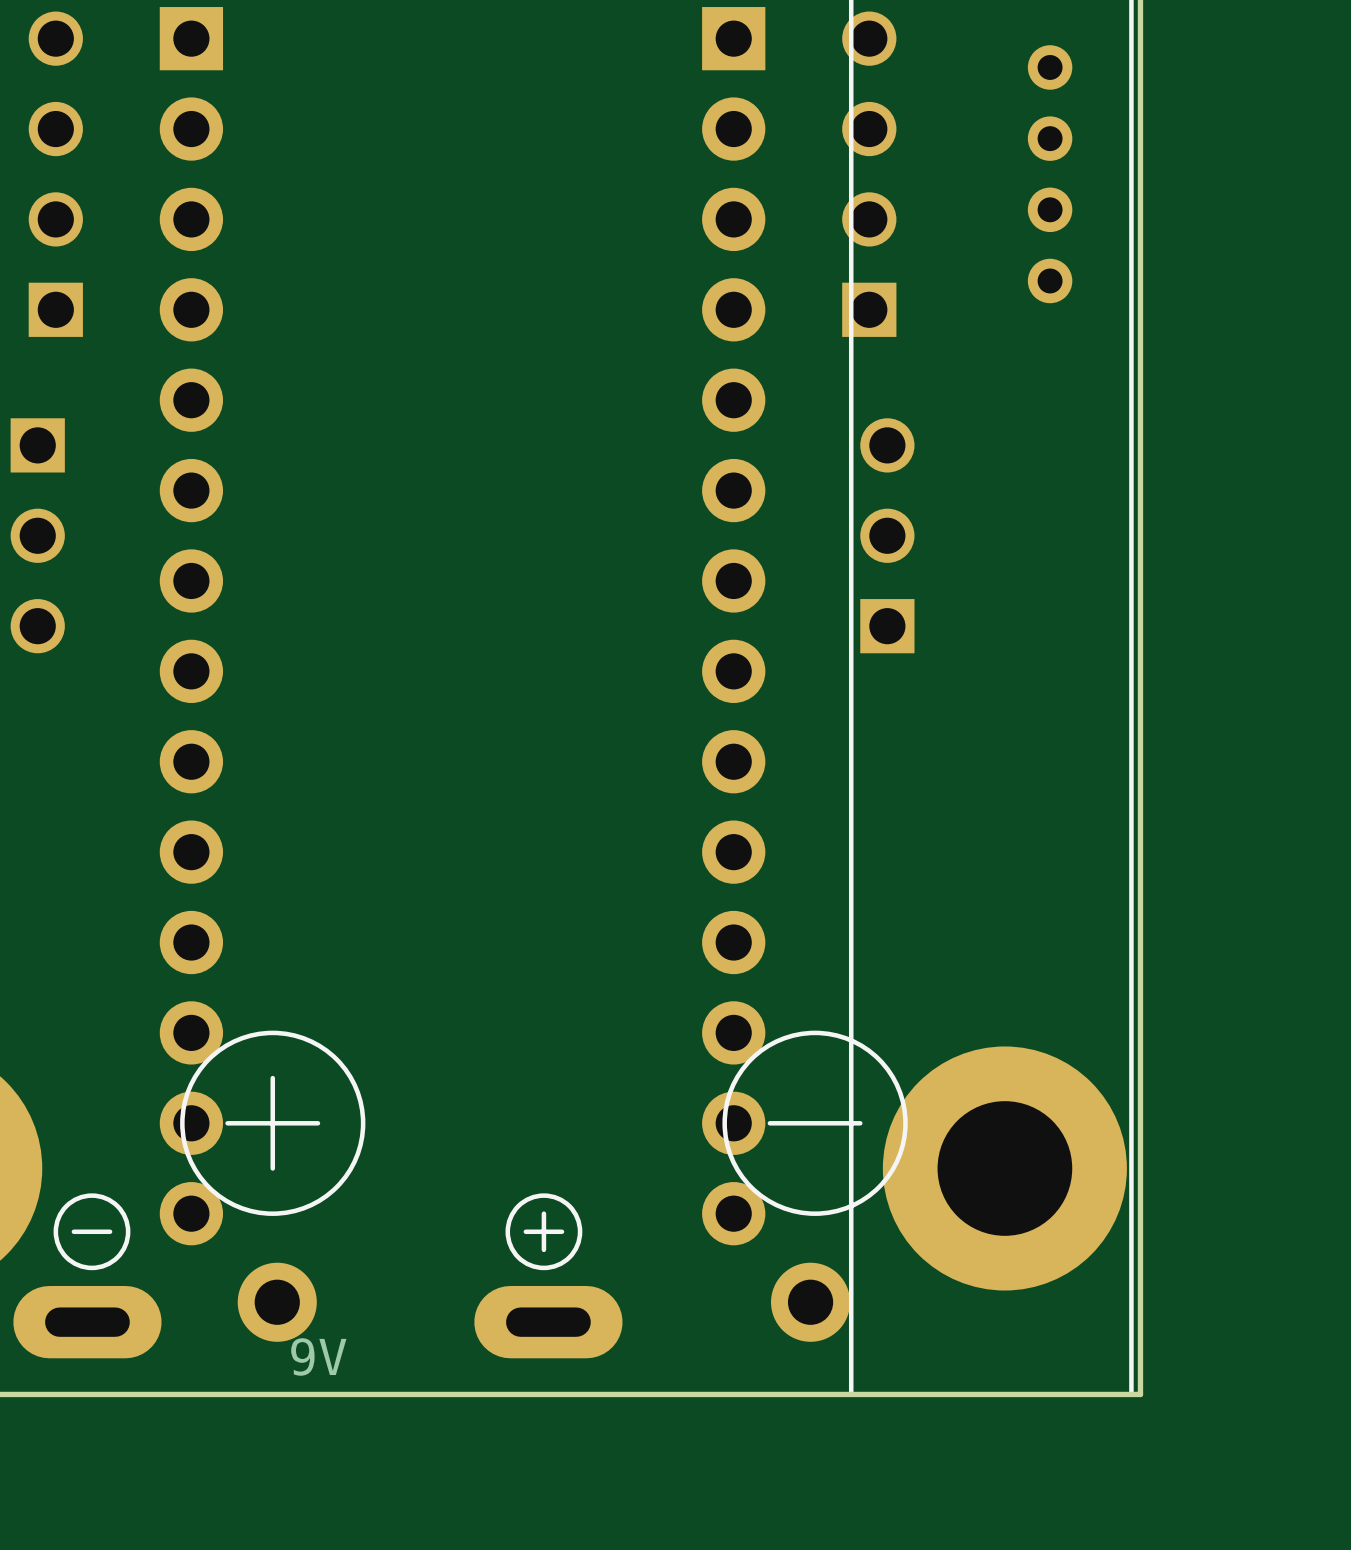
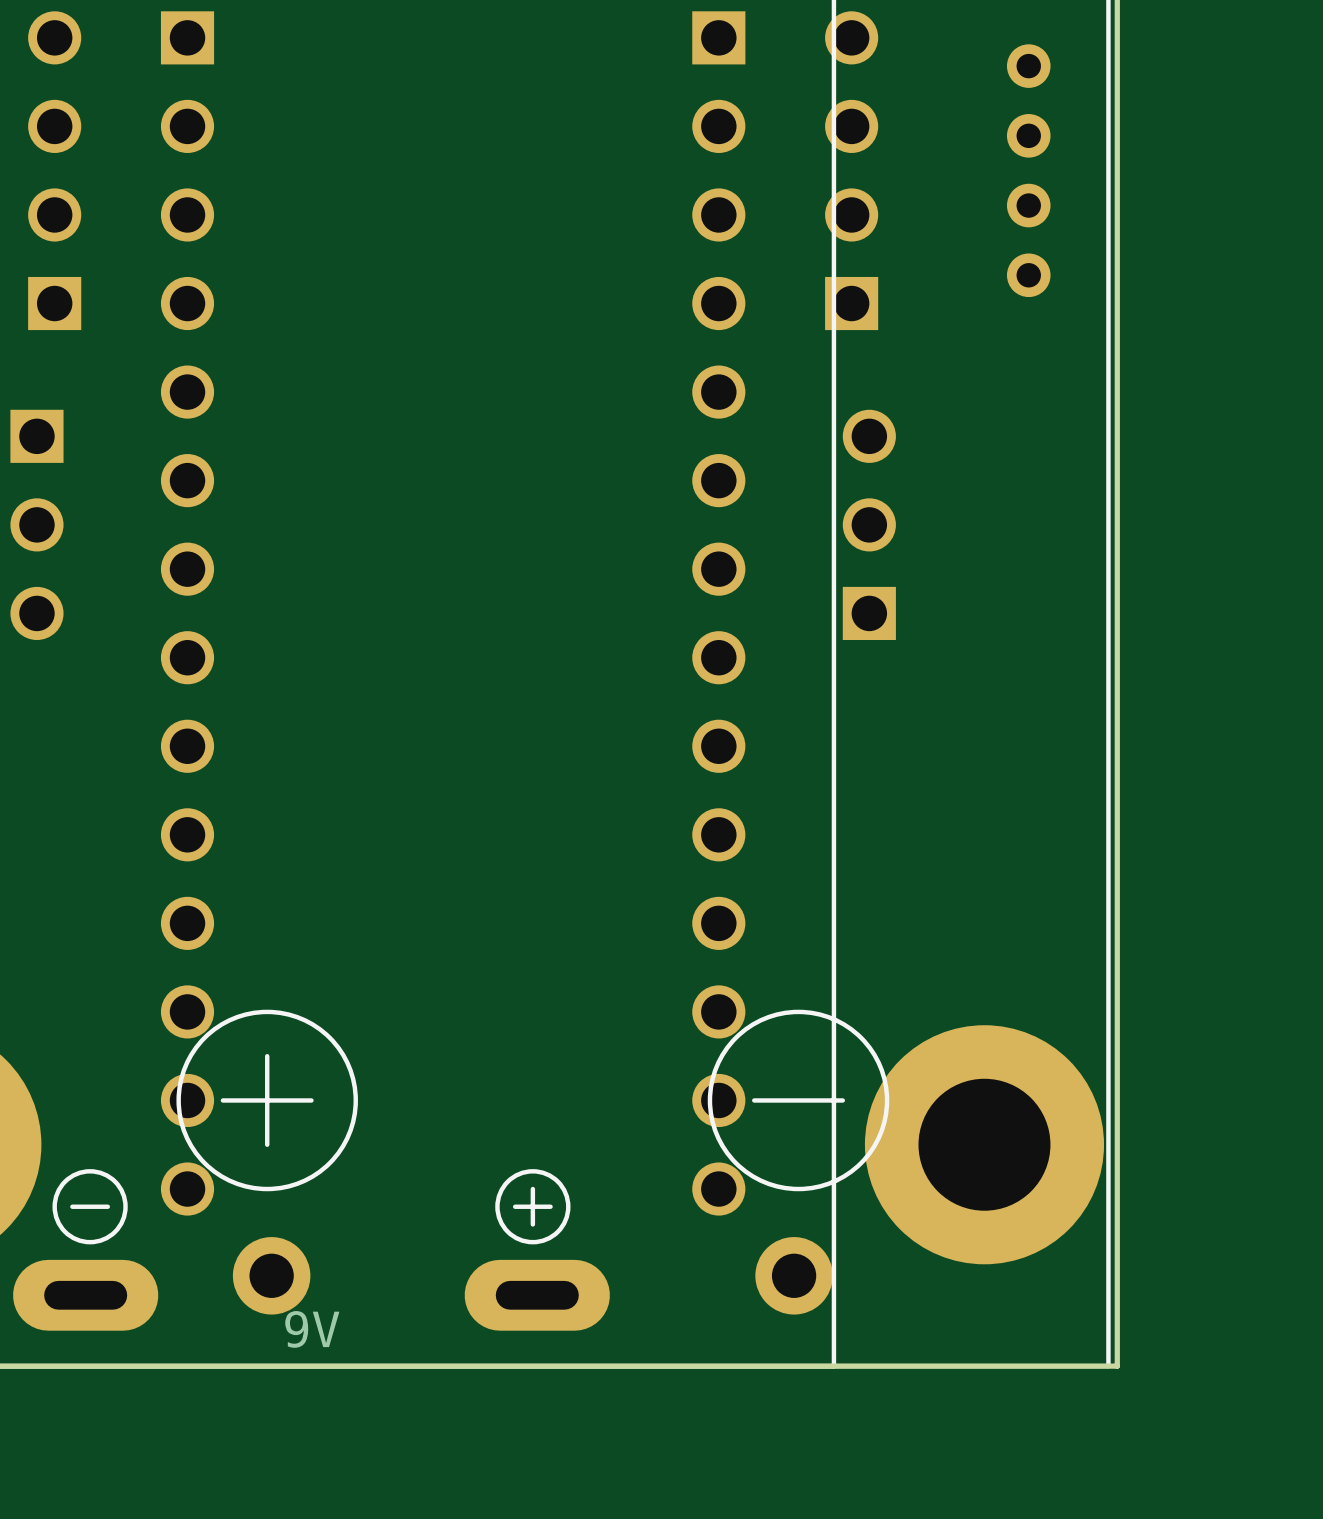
part footprint: [159, 7, 224, 1246] -> [160, 11, 215, 1216]
part footprint: [702, 7, 766, 1246] -> [692, 11, 746, 1216]

